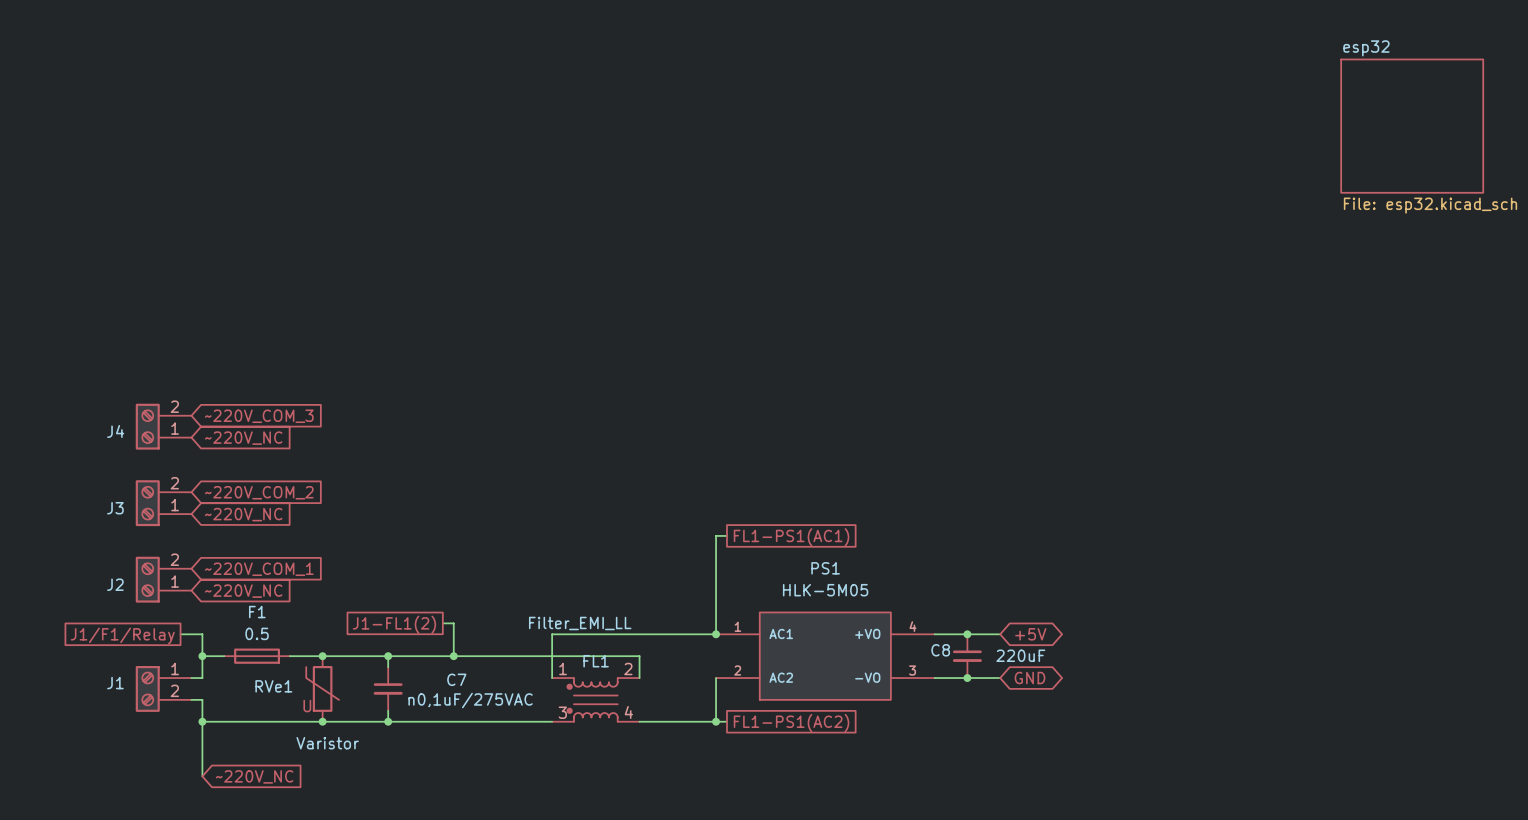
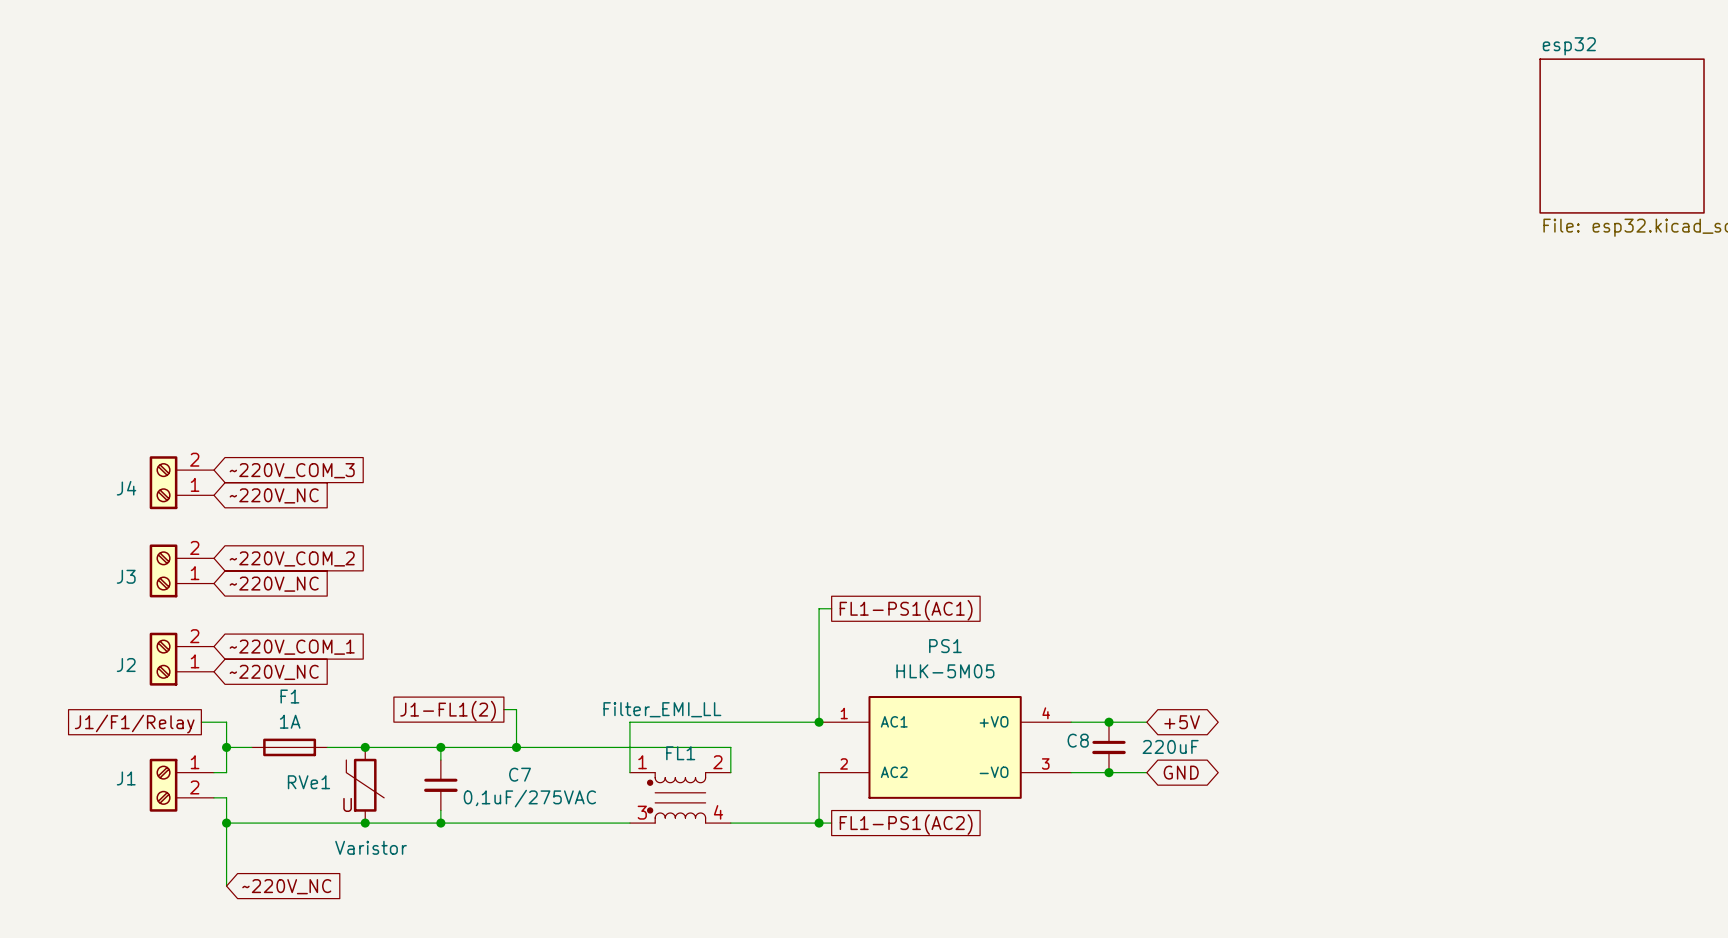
F1 value: 0.5 (257, 633) -> 1A (290, 721)
C7 text: n0,1uF/275VAC (470, 700) -> 0,1uF/275VAC (529, 798)

